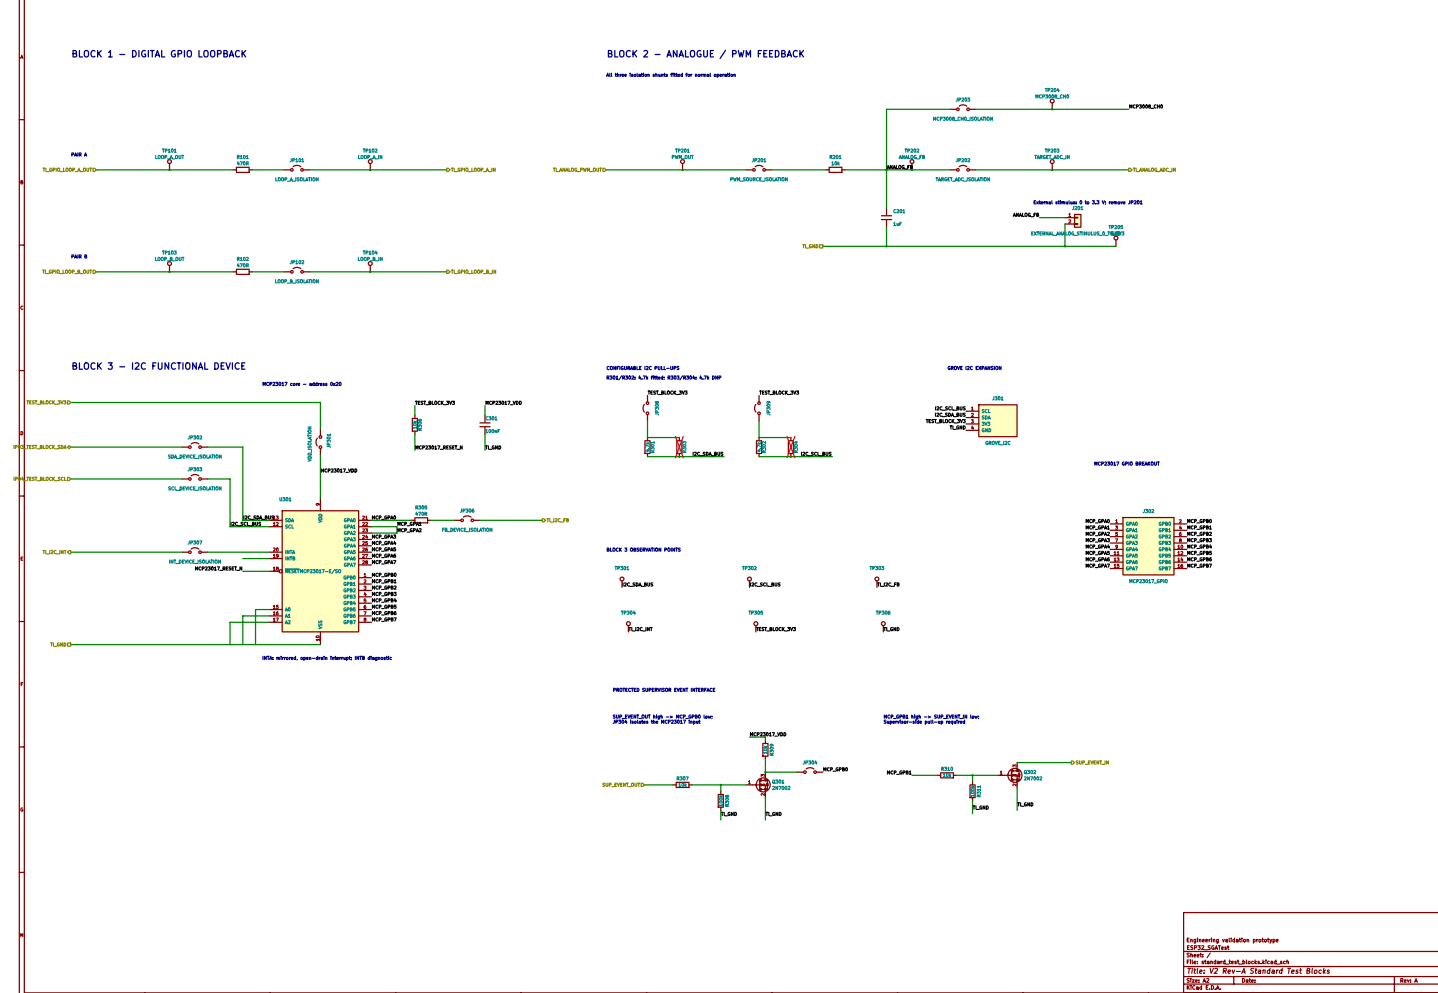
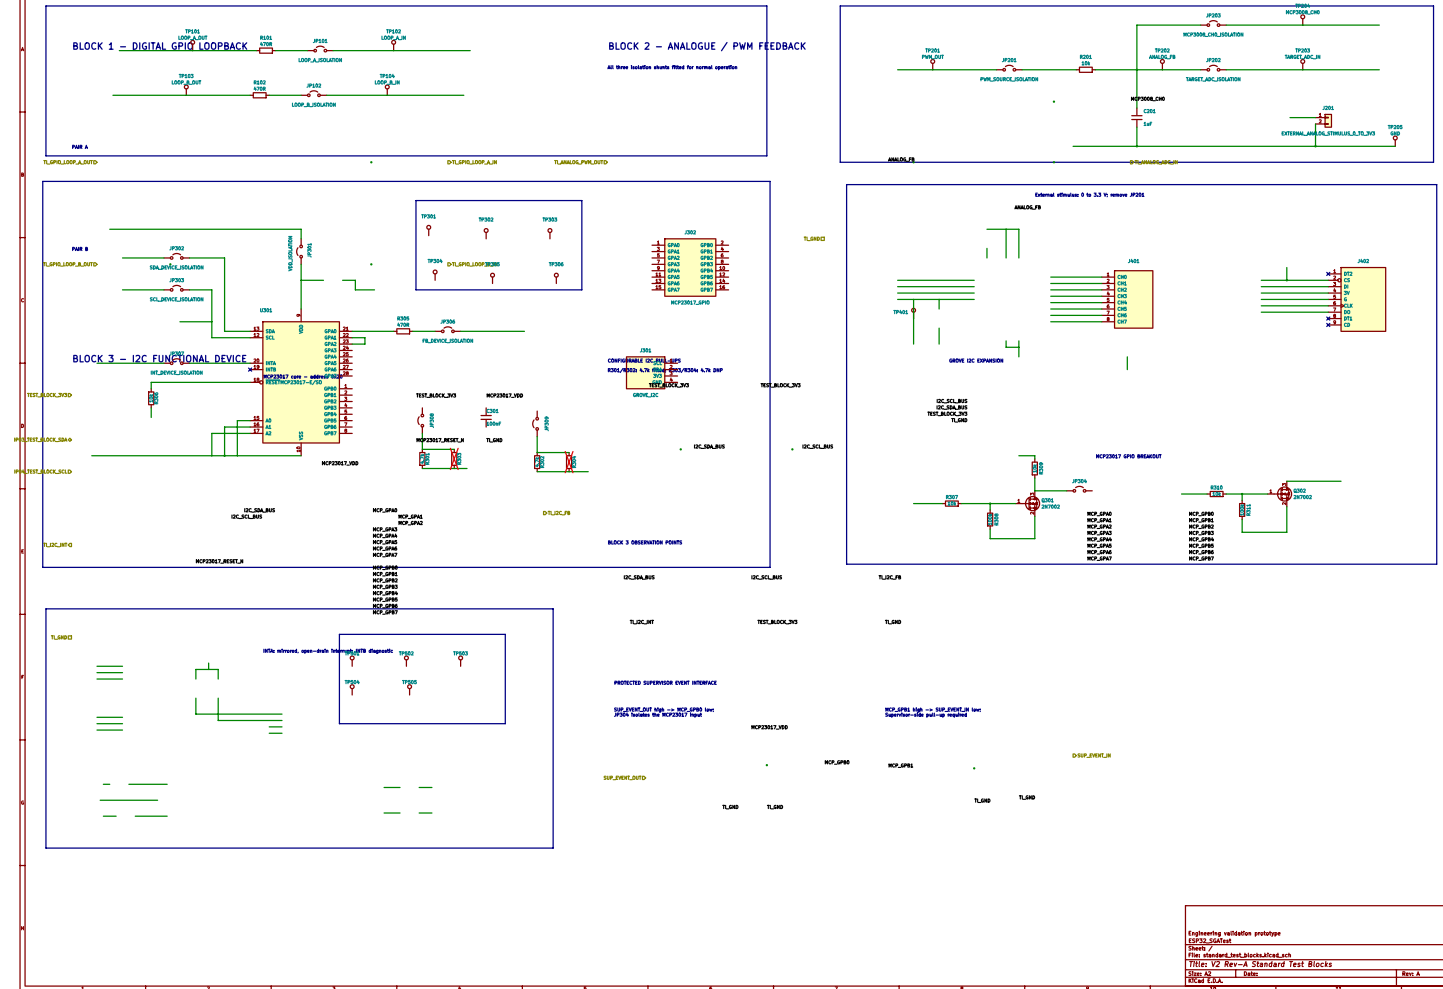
line: none -> (45, 5) (766, 5) (766, 155) (45, 155) (45, 5)
line: none -> (840, 5) (1433, 5) (1433, 162) (840, 162) (840, 5)
wire: none -> (1200, 25) (1136, 25) (1136, 108)
wire: none -> (1226, 25) (1379, 25)
wire: none -> (119, 50) (256, 50)
wire: none -> (275, 50) (307, 50)
wire: none -> (333, 50) (470, 50)
wire: none -> (897, 69) (996, 69)
wire: none -> (1022, 69) (1076, 69)
wire: none -> (1095, 69) (1200, 69)
wire: none -> (1226, 69) (1379, 69)
wire: none -> (112, 95) (250, 95)
wire: none -> (269, 95) (301, 95)
wire: none -> (326, 95) (463, 95)
part position: (1052, 104) -> (1302, 20)
part position: (962, 107) -> (1213, 23)
wire: (950, 109) (886, 109) (886, 208) -> none
wire: (975, 109) (1128, 109) -> none
wire: none -> (1289, 117) (1315, 117)
wire: none -> (1315, 123) (1315, 146)
wire: none -> (1136, 127) (1136, 146)
wire: none -> (1073, 146) (1395, 146)
part position: (169, 164) -> (192, 45)
part position: (370, 164) -> (393, 45)
part position: (682, 164) -> (932, 64)
part position: (912, 164) -> (1162, 64)
part position: (1052, 164) -> (1302, 64)
part position: (296, 168) -> (320, 49)
part position: (759, 168) -> (1009, 68)
part position: (962, 168) -> (1213, 68)
wire: (96, 169) (233, 169) -> none
part position: (242, 169) -> (266, 50)
wire: (252, 169) (284, 169) -> none
wire: (309, 169) (446, 169) -> none
wire: (606, 169) (746, 169) -> none
wire: (771, 169) (825, 169) -> none
part position: (835, 169) -> (1085, 69)
line: none -> (42, 181) (770, 181) (770, 567) (42, 567) (42, 181)
line: none -> (846, 184) (1436, 184) (1436, 564) (846, 564) (846, 184)
line: none -> (415, 200) (581, 200) (581, 289) (415, 289) (415, 200)
part position: (886, 217) -> (1136, 117)
wire: (1039, 217) (1064, 217) -> none
part position: (1073, 220) -> (1323, 120)
wire: (1064, 224) (1064, 246) -> none
wire: (886, 227) (886, 246) -> none
wire: none -> (109, 229) (301, 229) (301, 238)
wire: none -> (986, 229) (1018, 229) (1018, 257)
wire: none -> (1006, 229) (1006, 257)
part position: (1115, 241) -> (1395, 141)
wire: (822, 246) (1115, 246) -> none
wire: none -> (986, 248) (986, 257)
wire: none -> (122, 257) (163, 257)
wire: none -> (189, 257) (224, 257) (224, 331) (250, 331)
part position: (169, 266) -> (186, 90)
part position: (370, 266) -> (387, 90)
part position: (296, 270) -> (313, 93)
wire: (96, 271) (233, 271) -> none
part position: (242, 271) -> (259, 95)
wire: (252, 271) (284, 271) -> none
wire: none -> (301, 264) (301, 309)
wire: (309, 271) (446, 271) -> none
wire: none -> (1286, 267) (1286, 280)
no-connect mark: none -> (1328, 273)
wire: none -> (1050, 277) (1101, 277)
wire: none -> (301, 280) (323, 280)
wire: none -> (342, 280) (355, 280) (355, 289) (374, 289)
wire: none -> (897, 280) (974, 280)
wire: none -> (1261, 280) (1328, 280)
wire: none -> (1050, 283) (1101, 283)
wire: none -> (897, 286) (974, 286)
wire: none -> (1261, 286) (1328, 286)
wire: none -> (122, 289) (163, 289)
wire: none -> (189, 289) (211, 289) (211, 337) (250, 337)
wire: none -> (1050, 289) (1101, 289)
wire: none -> (897, 293) (974, 293)
wire: none -> (1261, 293) (1328, 293)
wire: none -> (1050, 296) (1101, 296)
wire: none -> (897, 299) (974, 299)
wire: none -> (913, 299) (913, 344)
wire: none -> (939, 299) (939, 309)
part: none -> (1127, 299)
wire: none -> (1261, 299) (1328, 299)
part: none -> (1357, 299)
wire: none -> (1050, 302) (1101, 302)
wire: none -> (1261, 305) (1328, 305)
wire: none -> (1050, 309) (1101, 309)
wire: none -> (1261, 312) (1328, 312)
part: none -> (913, 313)
wire: none -> (1050, 315) (1101, 315)
no-connect mark: none -> (1328, 318)
wire: none -> (179, 321) (211, 321)
wire: none -> (1050, 321) (1101, 321)
no-connect mark: none -> (1328, 324)
wire: none -> (939, 328) (939, 344)
wire: none -> (352, 331) (393, 331)
wire: none -> (412, 331) (435, 331)
wire: none -> (460, 331) (524, 331)
wire: none -> (352, 337) (364, 337) (364, 344) (352, 344)
wire: none -> (1006, 340) (1006, 347) (1018, 347)
wire: none -> (1018, 340) (1018, 356)
wire: none -> (1127, 356) (1127, 369)
wire: none -> (96, 363) (163, 363)
wire: none -> (189, 363) (250, 363)
no-connect mark: none -> (250, 369)
wire: none -> (250, 382) (151, 382) (151, 388)
wire: (70, 402) (320, 402) (320, 429) -> none
wire: (414, 405) (414, 415) -> none
wire: (484, 405) (484, 415) -> none
part position: (645, 408) -> (420, 420)
part position: (757, 408) -> (535, 423)
wire: none -> (151, 407) (151, 417)
wire: (647, 420) (647, 437) (679, 437) -> none
wire: (759, 420) (759, 437) (790, 437) -> none
part position: (991, 420) -> (651, 372)
part flip: as is (997, 420) -> left-right (645, 372)
part position: (414, 424) -> (151, 398)
wire: none -> (250, 420) (237, 420) (237, 455)
wire: none -> (250, 427) (224, 427) (224, 455)
wire: (414, 434) (414, 450) -> none
wire: (484, 434) (484, 450) -> none
wire: none -> (250, 433) (211, 433) (211, 455)
wire: none -> (422, 433) (422, 449) (454, 449)
part position: (318, 442) -> (299, 251)
wire: none -> (537, 436) (537, 452) (569, 452)
part position: (194, 445) -> (176, 256)
wire: (70, 447) (182, 447) -> none
wire: (207, 447) (242, 447) (242, 520) (269, 520) -> none
part position: (647, 447) -> (422, 458)
part position: (679, 447) -> (454, 458)
part position: (759, 447) -> (537, 462)
part position: (790, 447) -> (569, 462)
wire: (320, 454) (320, 498) -> none
wire: (647, 456) (723, 456) -> none
wire: (759, 456) (832, 456) -> none
wire: none -> (91, 455) (301, 455)
wire: none -> (1018, 455) (1034, 455) (1034, 458)
wire: none -> (422, 468) (467, 468)
part position: (194, 477) -> (176, 288)
wire: (70, 478) (182, 478) -> none
wire: (207, 478) (230, 478) (230, 526) (269, 526) -> none
wire: none -> (537, 471) (588, 471)
wire: none -> (1034, 478) (1034, 490) (1066, 490)
wire: none -> (1286, 481) (1341, 481)
wire: none -> (1181, 494) (1207, 494)
wire: none -> (1226, 494) (1267, 494)
wire: none -> (1242, 494) (1242, 500)
wire: none -> (913, 503) (942, 503)
wire: none -> (961, 503) (1015, 503)
wire: none -> (990, 503) (990, 509)
wire: none -> (1286, 506) (1286, 532) (1242, 532) (1242, 519)
part position: (467, 518) -> (447, 329)
wire: (371, 520) (411, 520) -> none
part position: (421, 520) -> (403, 331)
wire: (430, 520) (454, 520) -> none
wire: (479, 520) (542, 520) -> none
wire: none -> (1034, 516) (1034, 538) (990, 538) (990, 529)
wire: (371, 526) (396, 526) (396, 533) (371, 533) -> none
part position: (1148, 546) -> (690, 267)
part position: (194, 550) -> (176, 361)
wire: (70, 552) (182, 552) -> none
wire: (207, 552) (269, 552) -> none
wire: (242, 558) (269, 558) -> none
wire: (242, 571) (269, 571) -> none
part position: (320, 571) -> (301, 382)
part position: (622, 582) -> (428, 230)
part position: (749, 582) -> (486, 233)
part position: (876, 582) -> (549, 233)
wire: (269, 609) (255, 609) (255, 644) -> none
wire: (269, 615) (242, 615) (242, 644) -> none
line: none -> (45, 608) (45, 848) (553, 848) (553, 608) (45, 608)
wire: (269, 622) (230, 622) (230, 644) -> none
part position: (628, 626) -> (435, 275)
part position: (755, 626) -> (492, 278)
part position: (883, 626) -> (556, 278)
line: none -> (339, 634) (505, 634) (505, 723) (339, 723) (339, 634)
wire: (70, 644) (320, 644) -> none
part: none -> (352, 661)
part: none -> (406, 661)
part: none -> (460, 661)
wire: none -> (208, 663) (208, 669)
wire: none -> (96, 666) (122, 666)
wire: none -> (96, 672) (122, 672)
wire: none -> (96, 679) (122, 679)
wire: none -> (195, 679) (195, 669) (218, 669) (218, 679)
part: none -> (352, 689)
part: none -> (409, 689)
wire: none -> (195, 698) (195, 714) (282, 714)
wire: none -> (218, 698) (218, 720) (282, 720)
wire: none -> (96, 717) (122, 717)
wire: none -> (96, 723) (122, 723)
wire: none -> (269, 726) (282, 726)
wire: none -> (96, 730) (122, 730)
wire: (749, 737) (765, 737) (765, 740) -> none
wire: none -> (269, 733) (282, 733)
part position: (765, 749) -> (1034, 468)
wire: (765, 759) (765, 772) (797, 772) -> none
wire: (1017, 762) (1071, 762) -> none
part position: (810, 770) -> (1079, 489)
wire: (912, 775) (937, 775) -> none
part position: (947, 775) -> (1216, 494)
wire: (956, 775) (998, 775) -> none
wire: (972, 775) (972, 781) -> none
part position: (1010, 775) -> (1279, 494)
wire: (644, 784) (672, 784) -> none
part position: (682, 784) -> (951, 503)
wire: (692, 784) (746, 784) -> none
wire: (720, 784) (720, 791) -> none
part position: (758, 784) -> (1027, 503)
wire: (1017, 788) (1017, 810) -> none
wire: none -> (103, 784) (109, 784)
wire: none -> (128, 784) (167, 784)
part position: (972, 791) -> (1242, 509)
wire: none -> (384, 787) (400, 787)
wire: none -> (419, 787) (431, 787)
wire: (765, 797) (765, 819) -> none
part position: (720, 800) -> (990, 519)
wire: (972, 800) (972, 813) -> none
wire: none -> (100, 800) (157, 800)
wire: (720, 810) (720, 819) -> none
wire: none -> (384, 813) (400, 813)
wire: none -> (419, 813) (431, 813)
wire: none -> (103, 816) (116, 816)
wire: none -> (135, 816) (167, 816)

